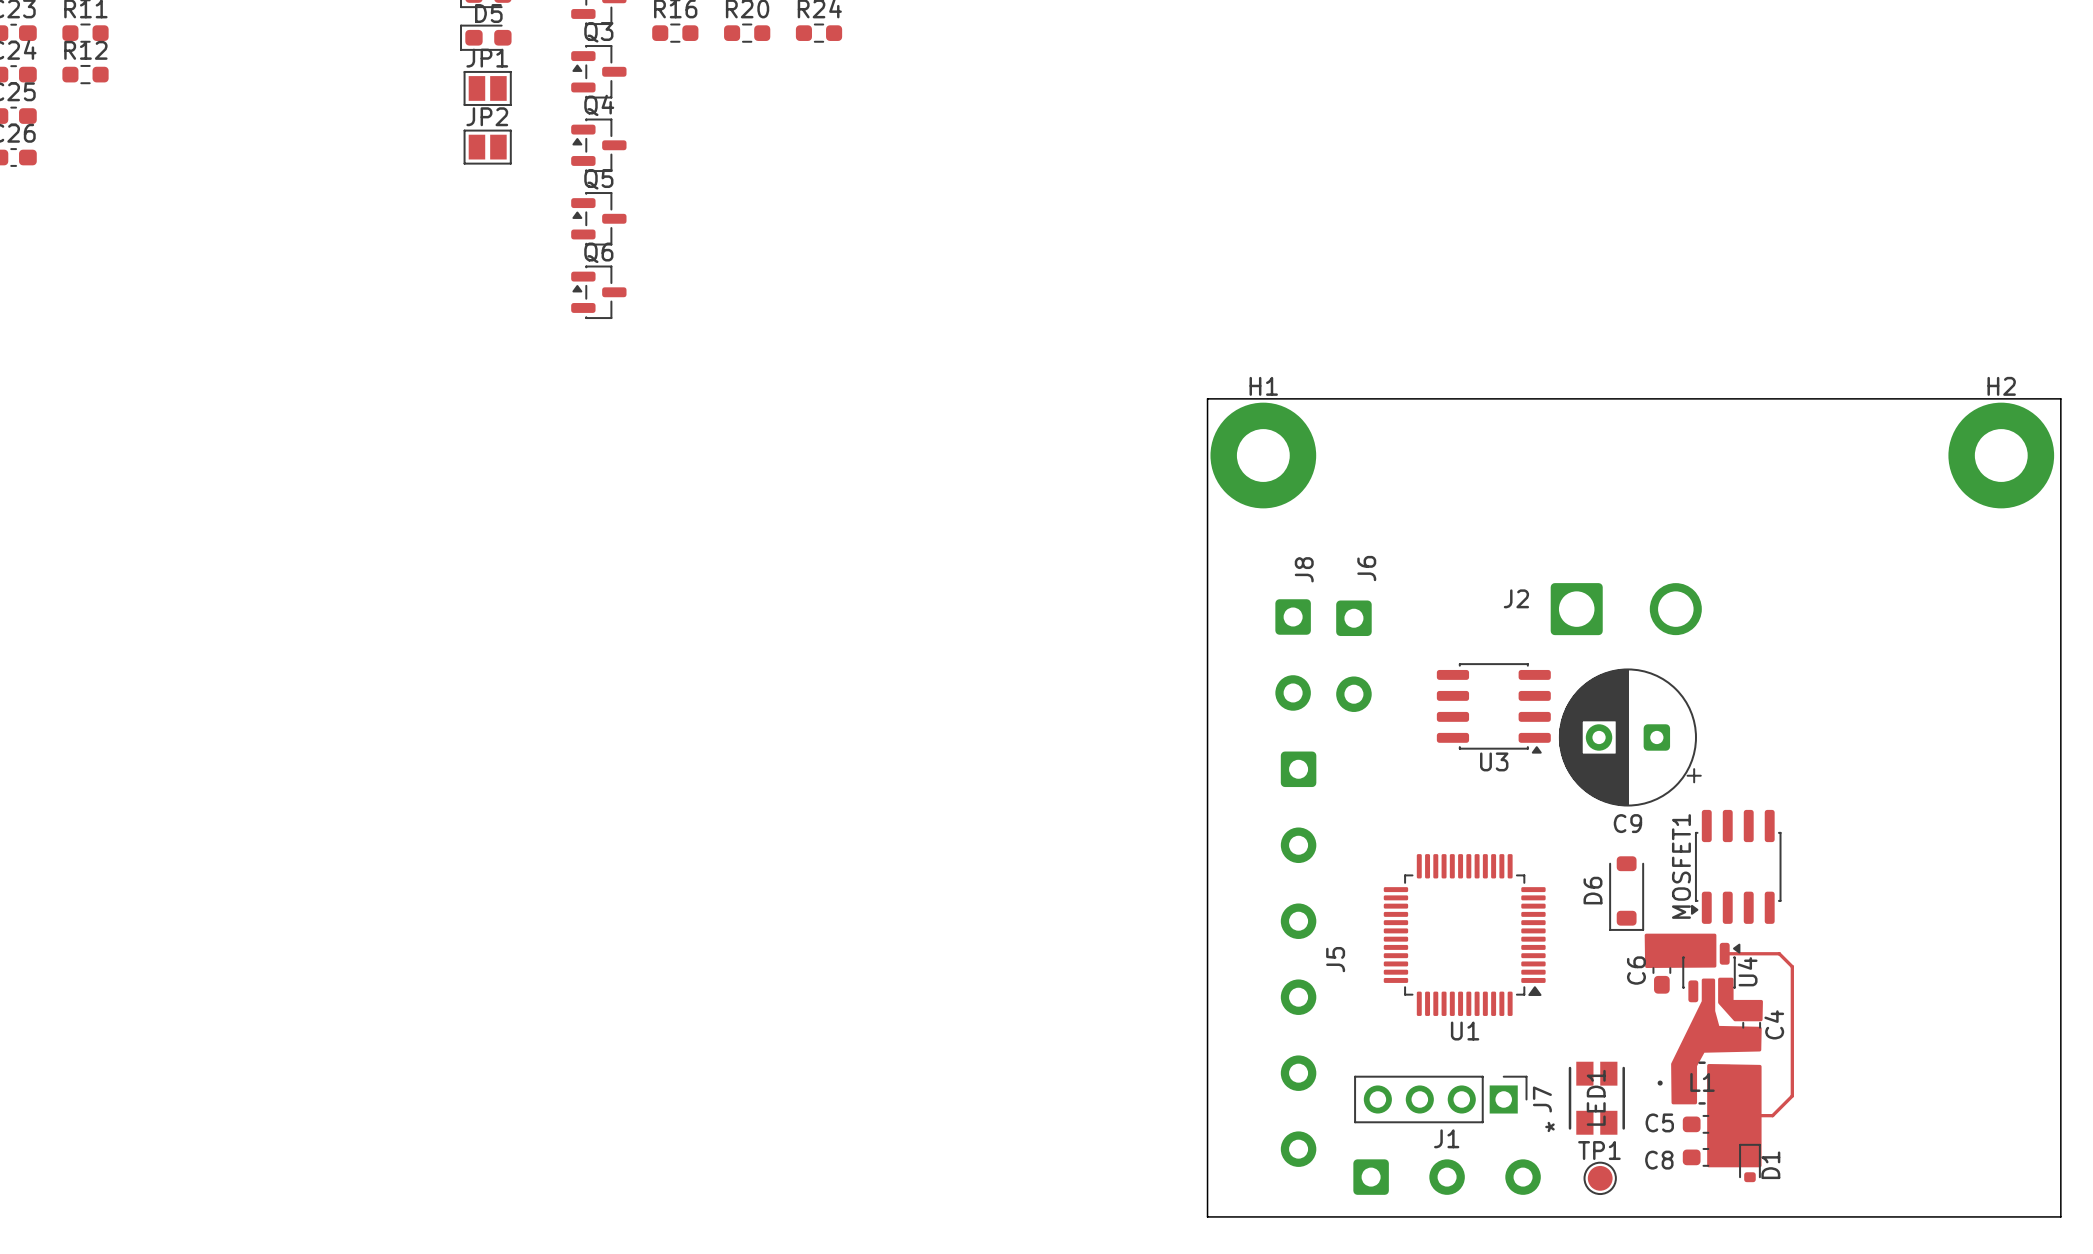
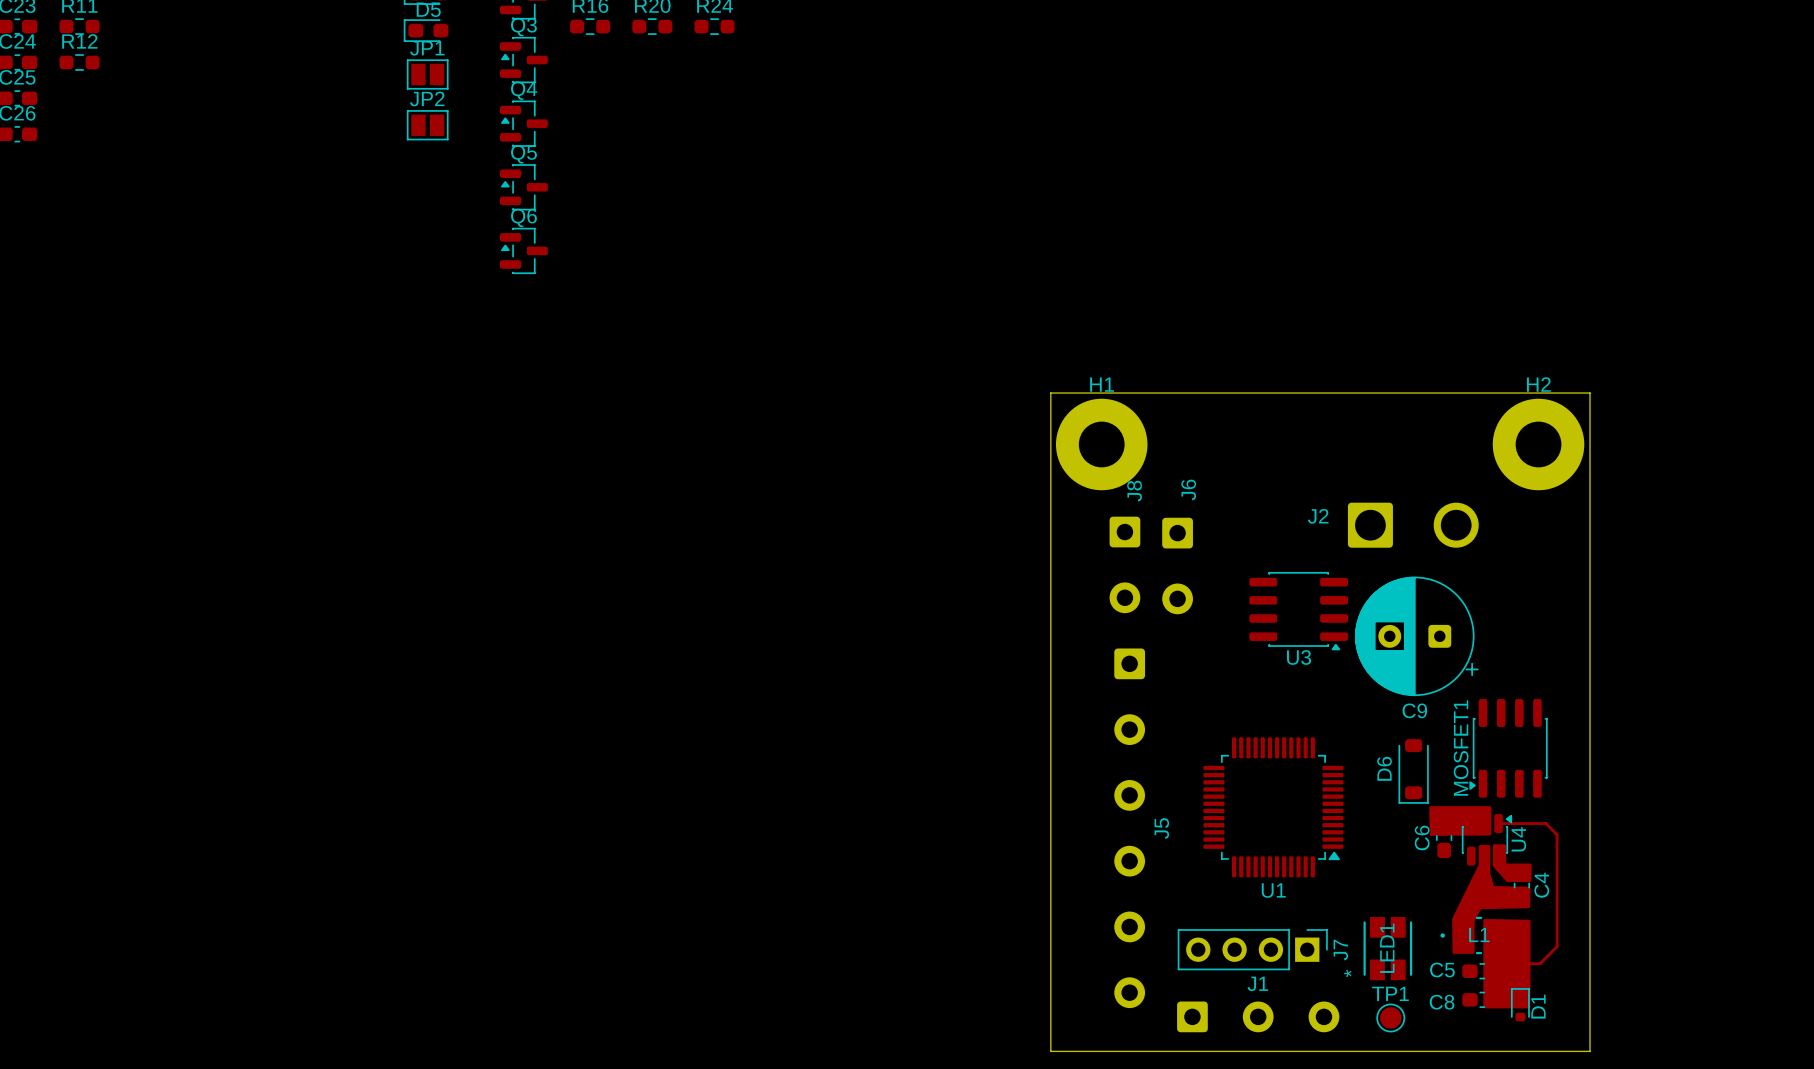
H1 position: (1263, 455) -> (1101, 444)
H2 position: (2001, 455) -> (1538, 444)
board edge: (1207, 456) (1207, 398) (2060, 398) (2060, 1216) (1830, 1216) -> (1050, 393) (1590, 393) (1590, 1051)

